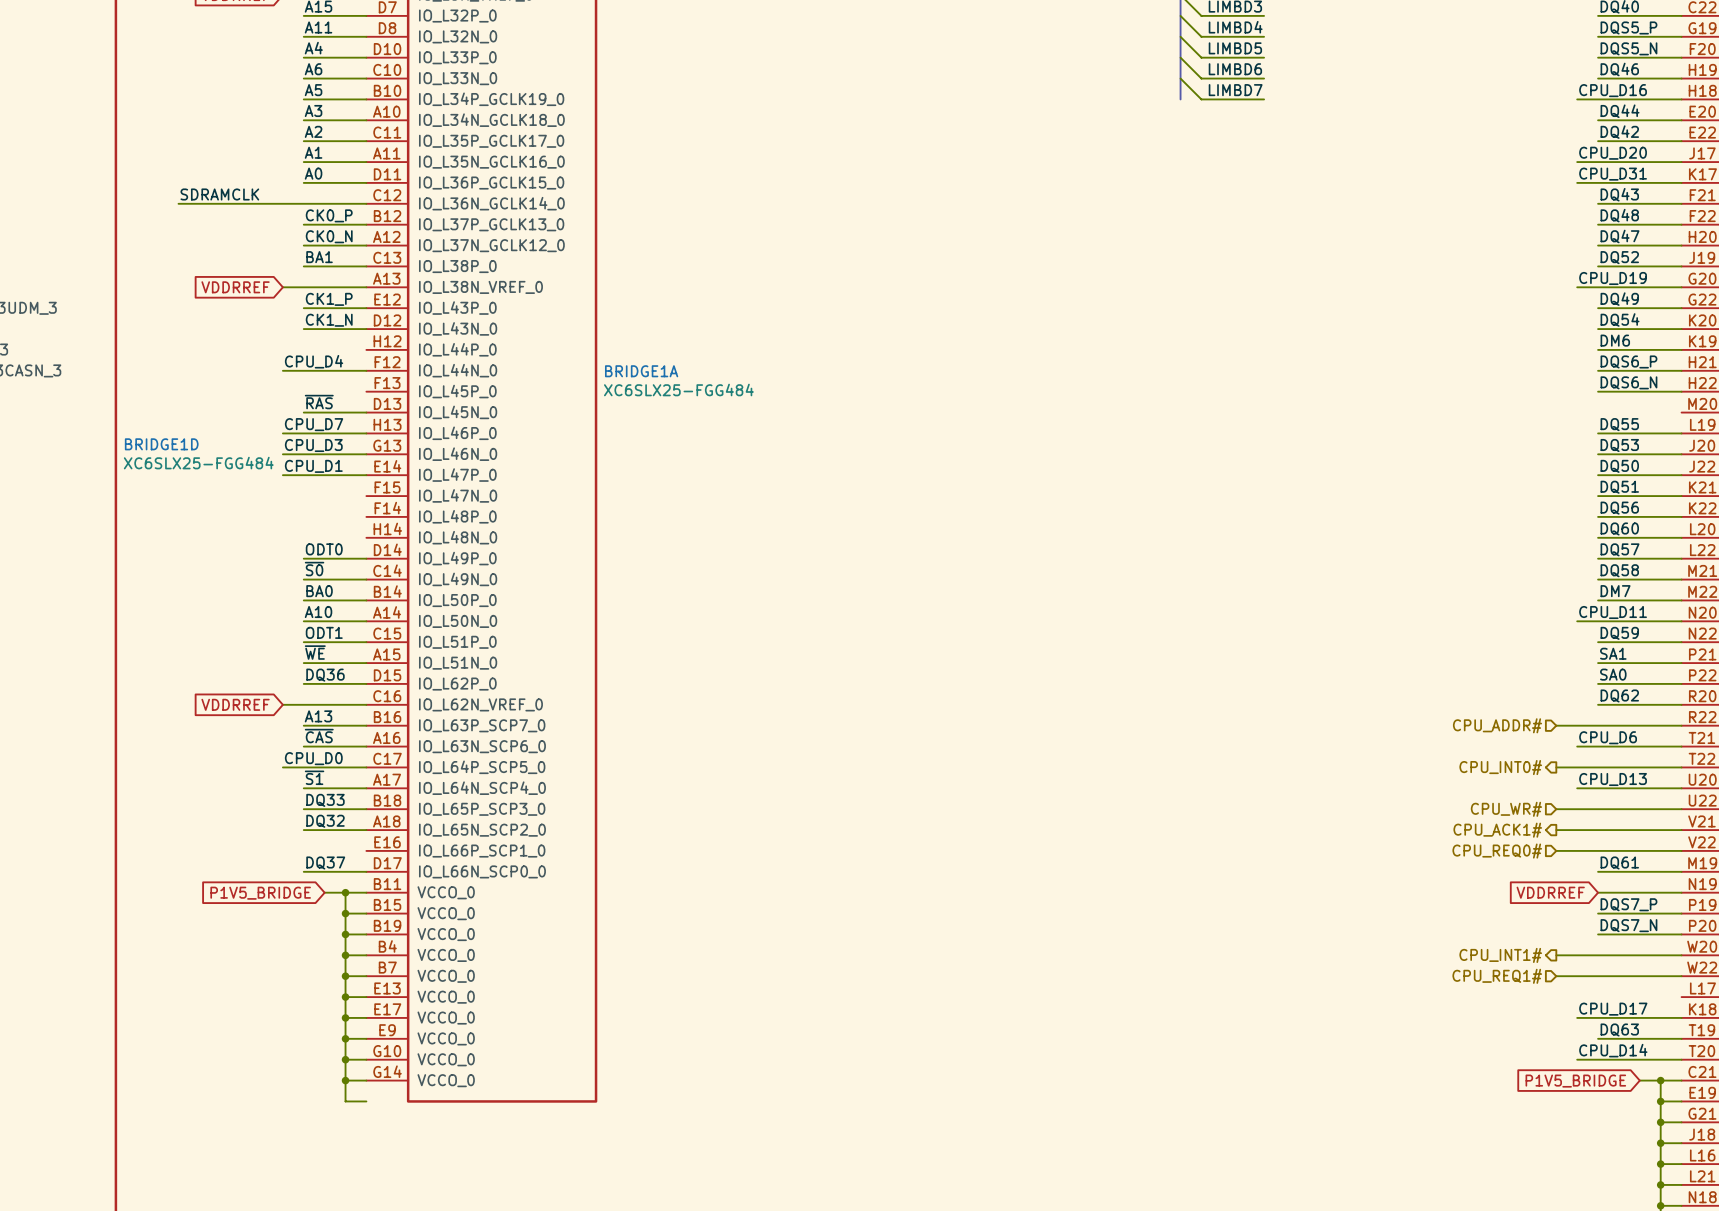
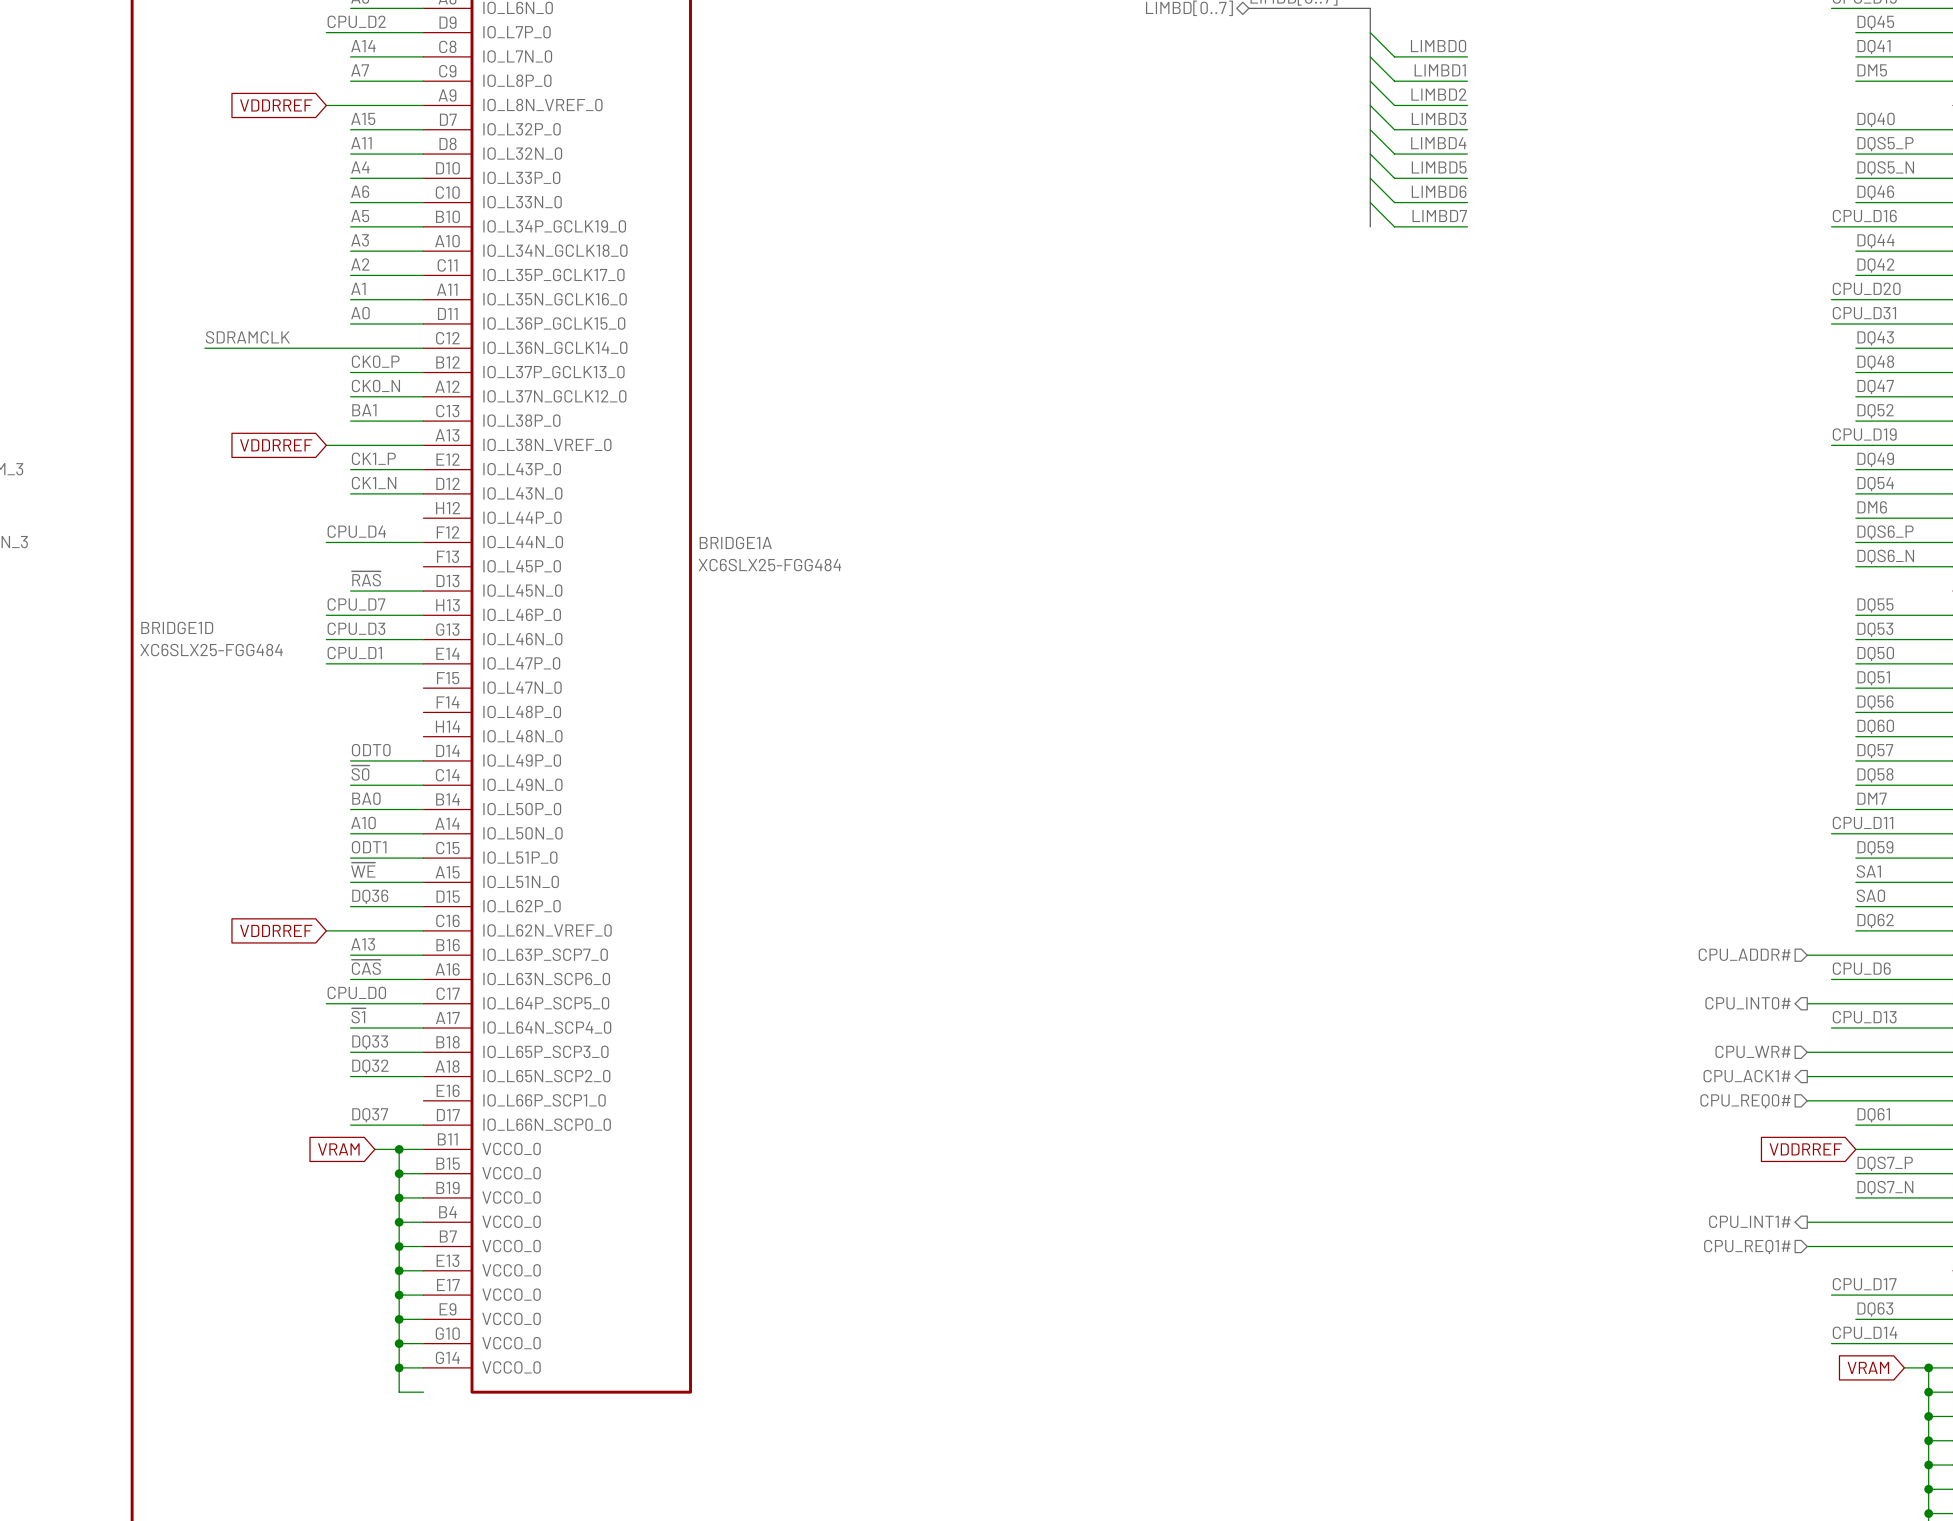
global label: P1V5_BRIDGE (260, 893) -> VRAM (338, 1149)
global label: P1V5_BRIDGE (1575, 1081) -> VRAM (1868, 1367)

